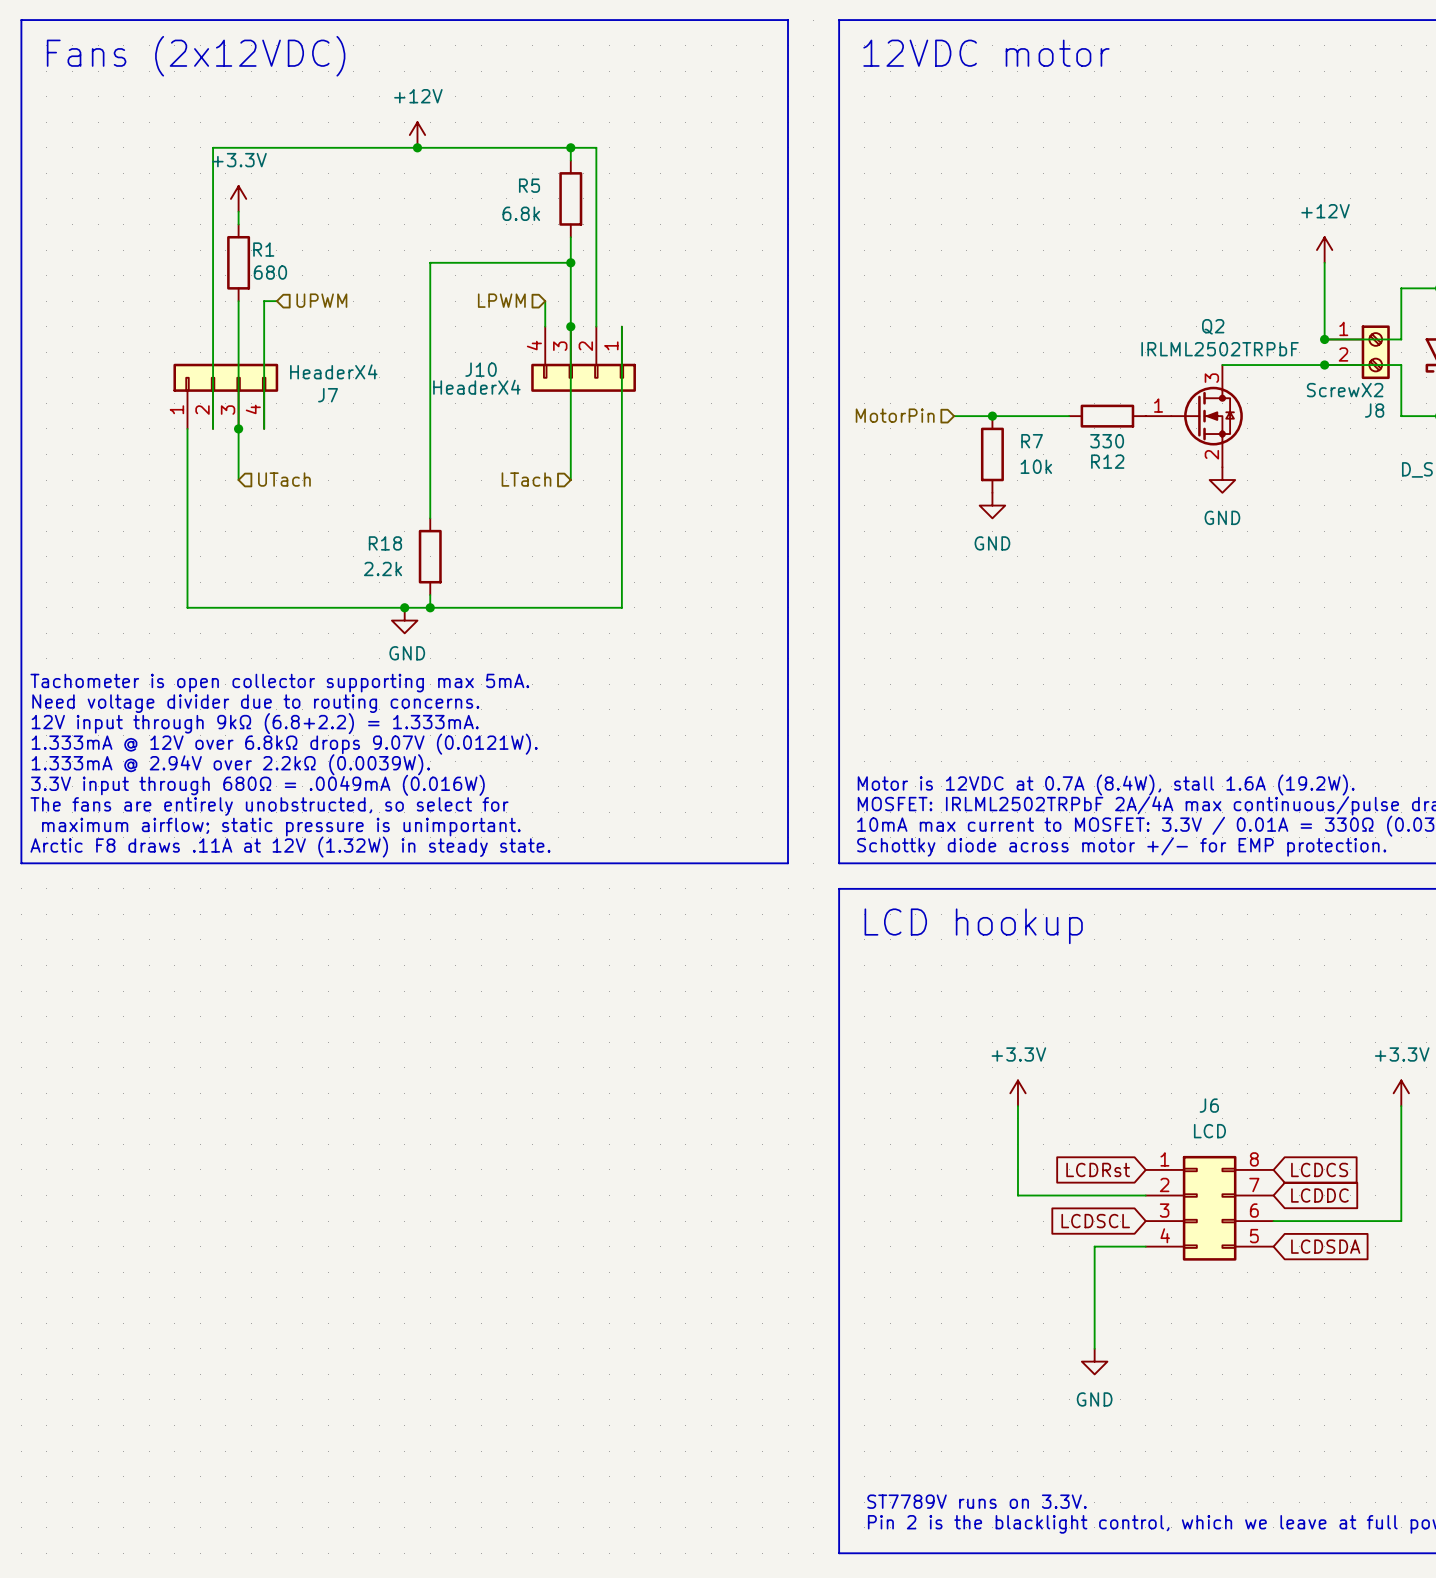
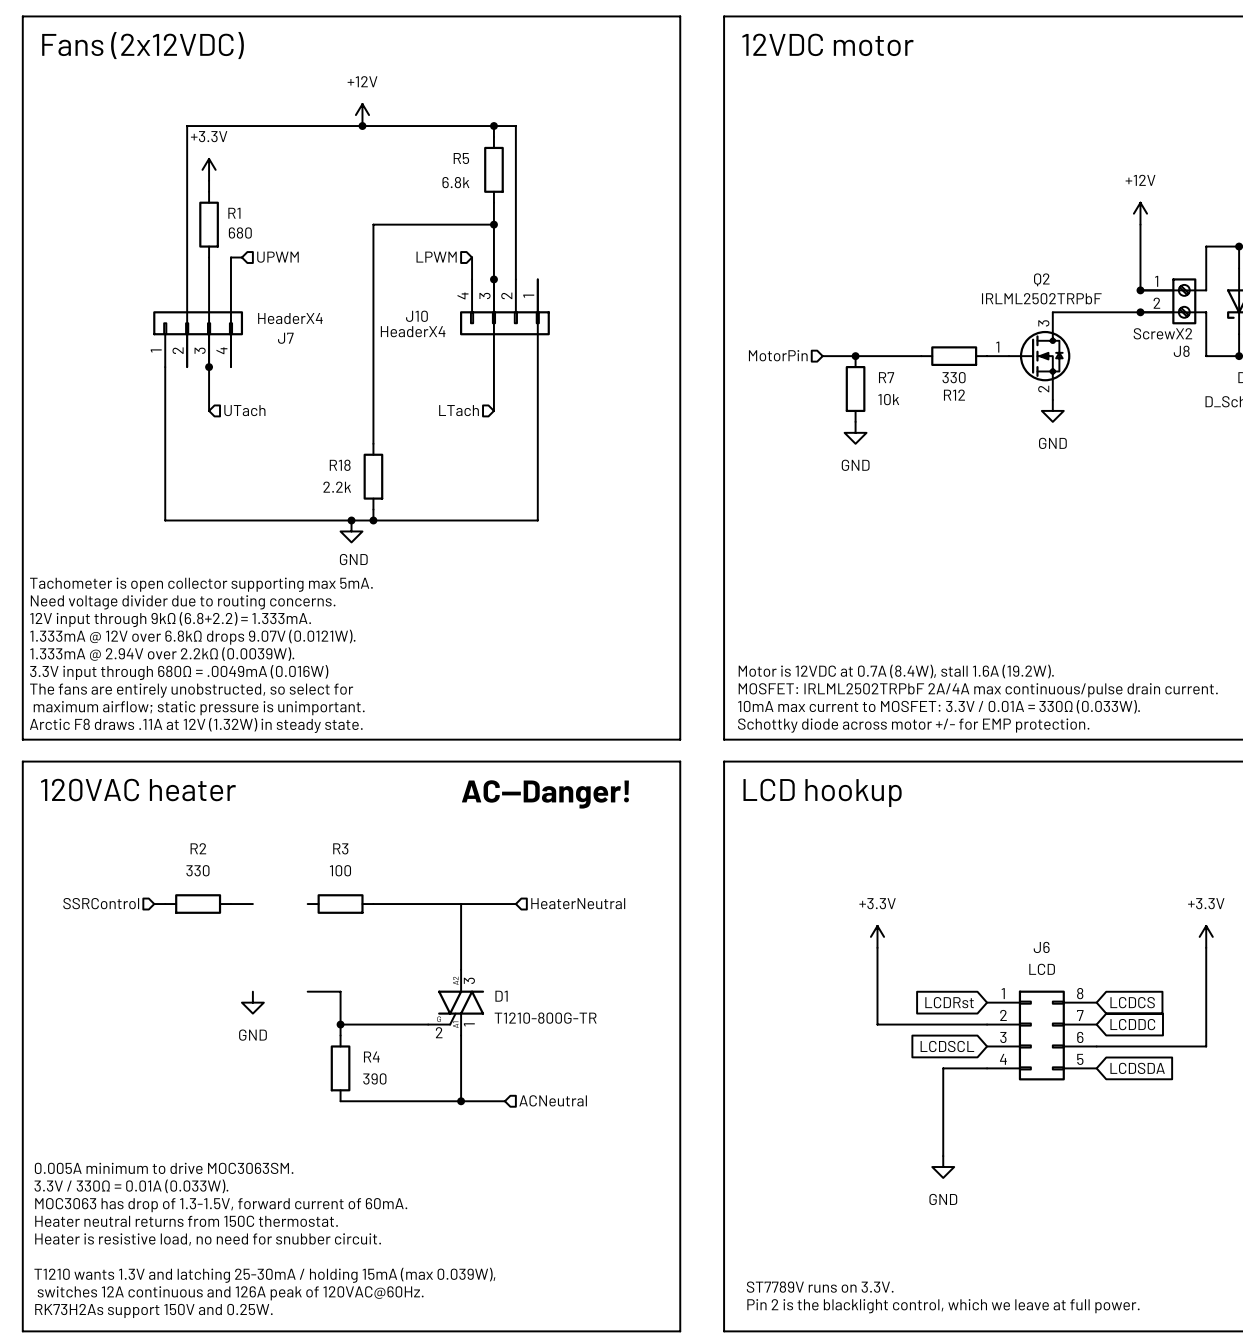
line: none -> (22, 761) (680, 761) (680, 1331) (22, 1331) (22, 761)
text: none -> 120VAC heater (138, 790)
text: none -> AC—Danger! (545, 794)
hierarchical label: none -> SSRControl (101, 903)
wire: none -> (154, 904) (165, 904)
R2: none -> 330 (198, 904)
wire: none -> (230, 904) (252, 904)
R3: none -> 100 (340, 904)
wire: none -> (373, 904) (515, 904)
wire: none -> (461, 904) (461, 969)
hierarchical label: none -> HeaterNeutral (578, 903)
wire: none -> (307, 991) (340, 991) (340, 1035)
power symbol: none -> GND (252, 1002)
D1: none -> T1210-800G-TR (456, 1002)
wire: none -> (340, 1024) (428, 1024)
junction: none -> (340, 1024)
wire: none -> (461, 1035) (461, 1101)
R4: none -> 390 (340, 1068)
wire: none -> (340, 1101) (504, 1101)
junction: none -> (461, 1101)
hierarchical label: none -> ACNeutral (553, 1100)
text: none -> 0.005A minimum to drive MOC3063SM. (164, 1168)
text: none -> 3.3V / 330Ω = 0.01A (0.033W). (131, 1186)
text: none -> MOC3063 has drop of 1.3-1.5V, forward current of 60mA. (221, 1205)
text: none -> Heater neutral returns from 150C thermostat. (186, 1221)
text: none -> Heater is resistive load, no need for snubber circuit. (208, 1239)
text: none -> T1210 wants 1.3V and latching 25-30mA / holding 15mA (max 0.039W), (264, 1275)
text: none -> switches 12A continuous and 126A peak of 120VAC@60Hz. (230, 1293)
text: none -> RK73H2As support 150V and 0.25W. (153, 1310)

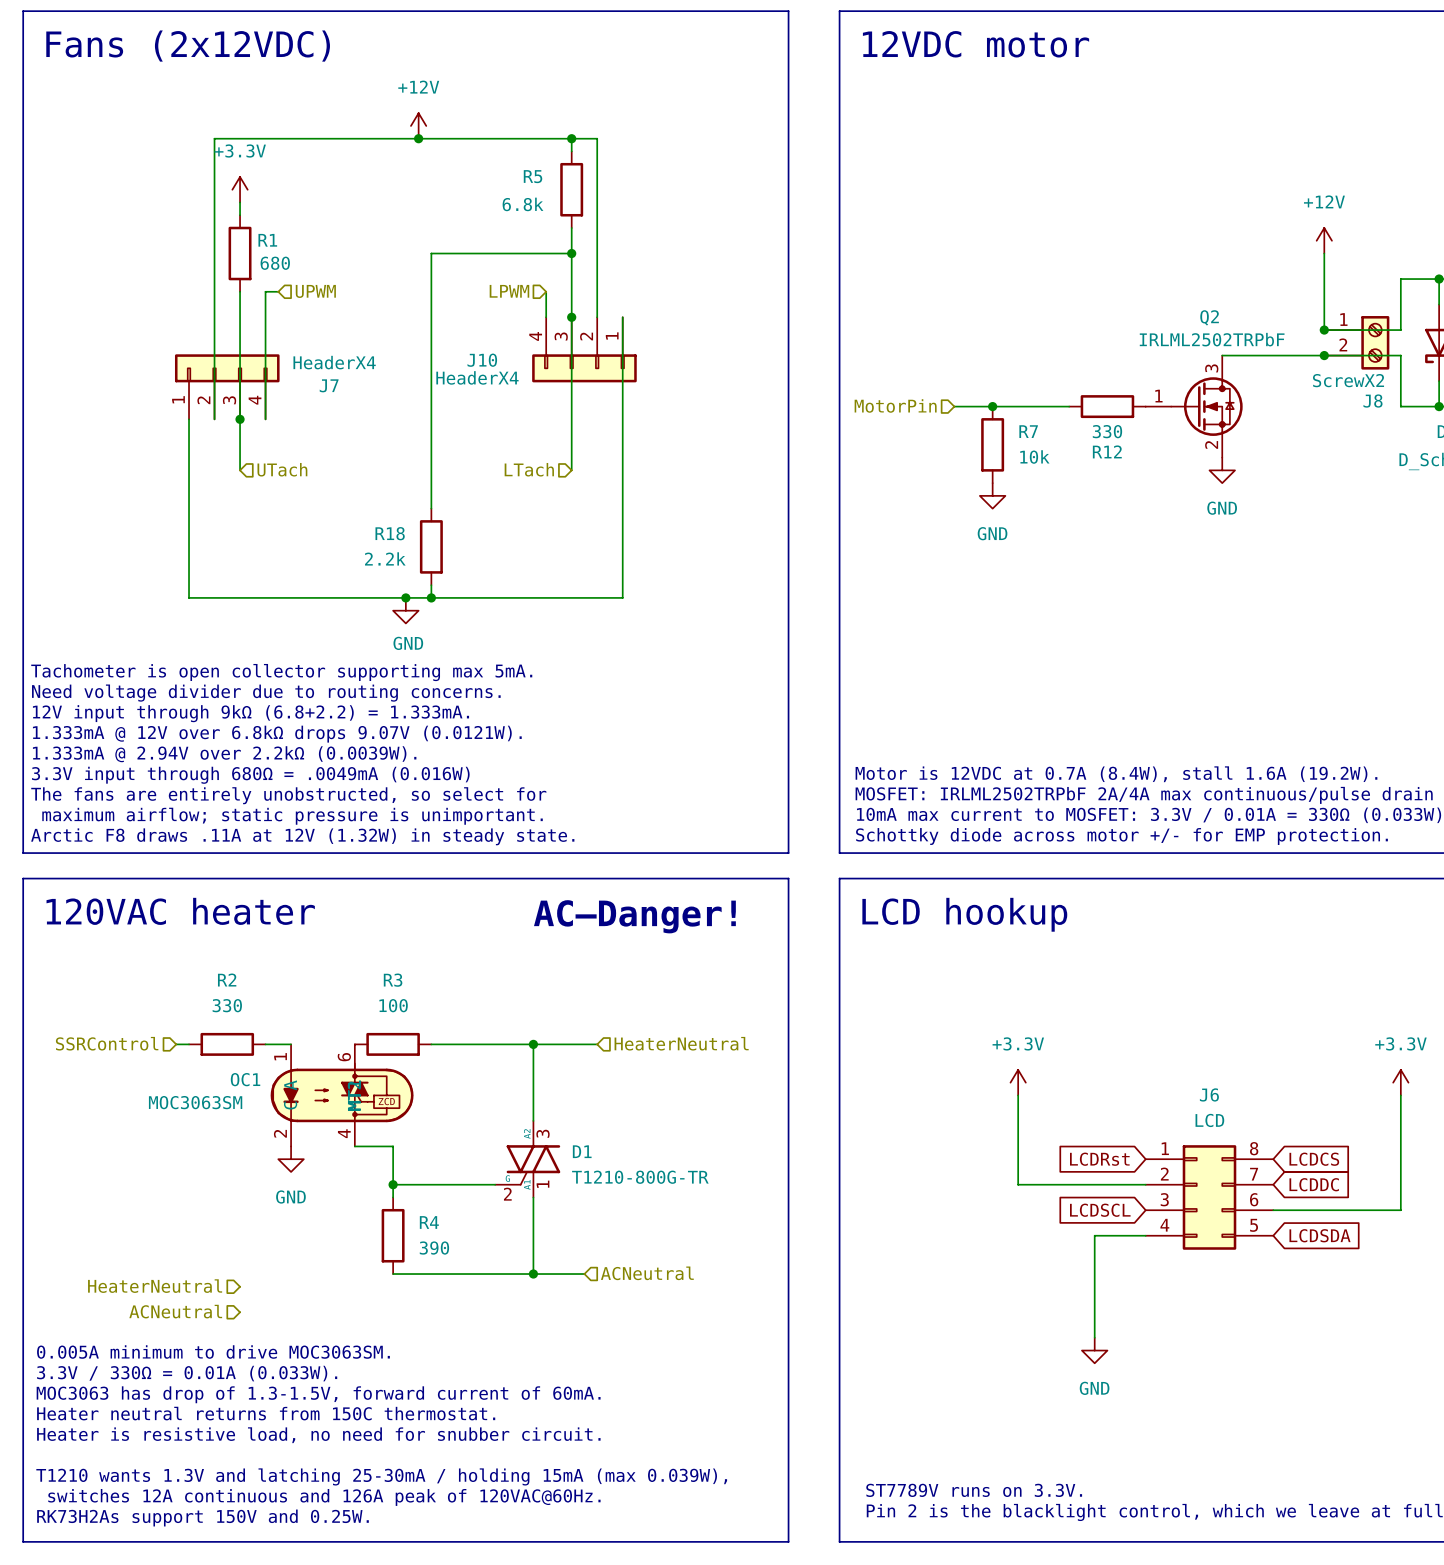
junction: none -> (533, 1044)
OC1: none -> MOC3063SM (342, 1095)
hierarchical label: none -> HeaterNeutral (155, 1286)
hierarchical label: none -> ACNeutral (175, 1311)

